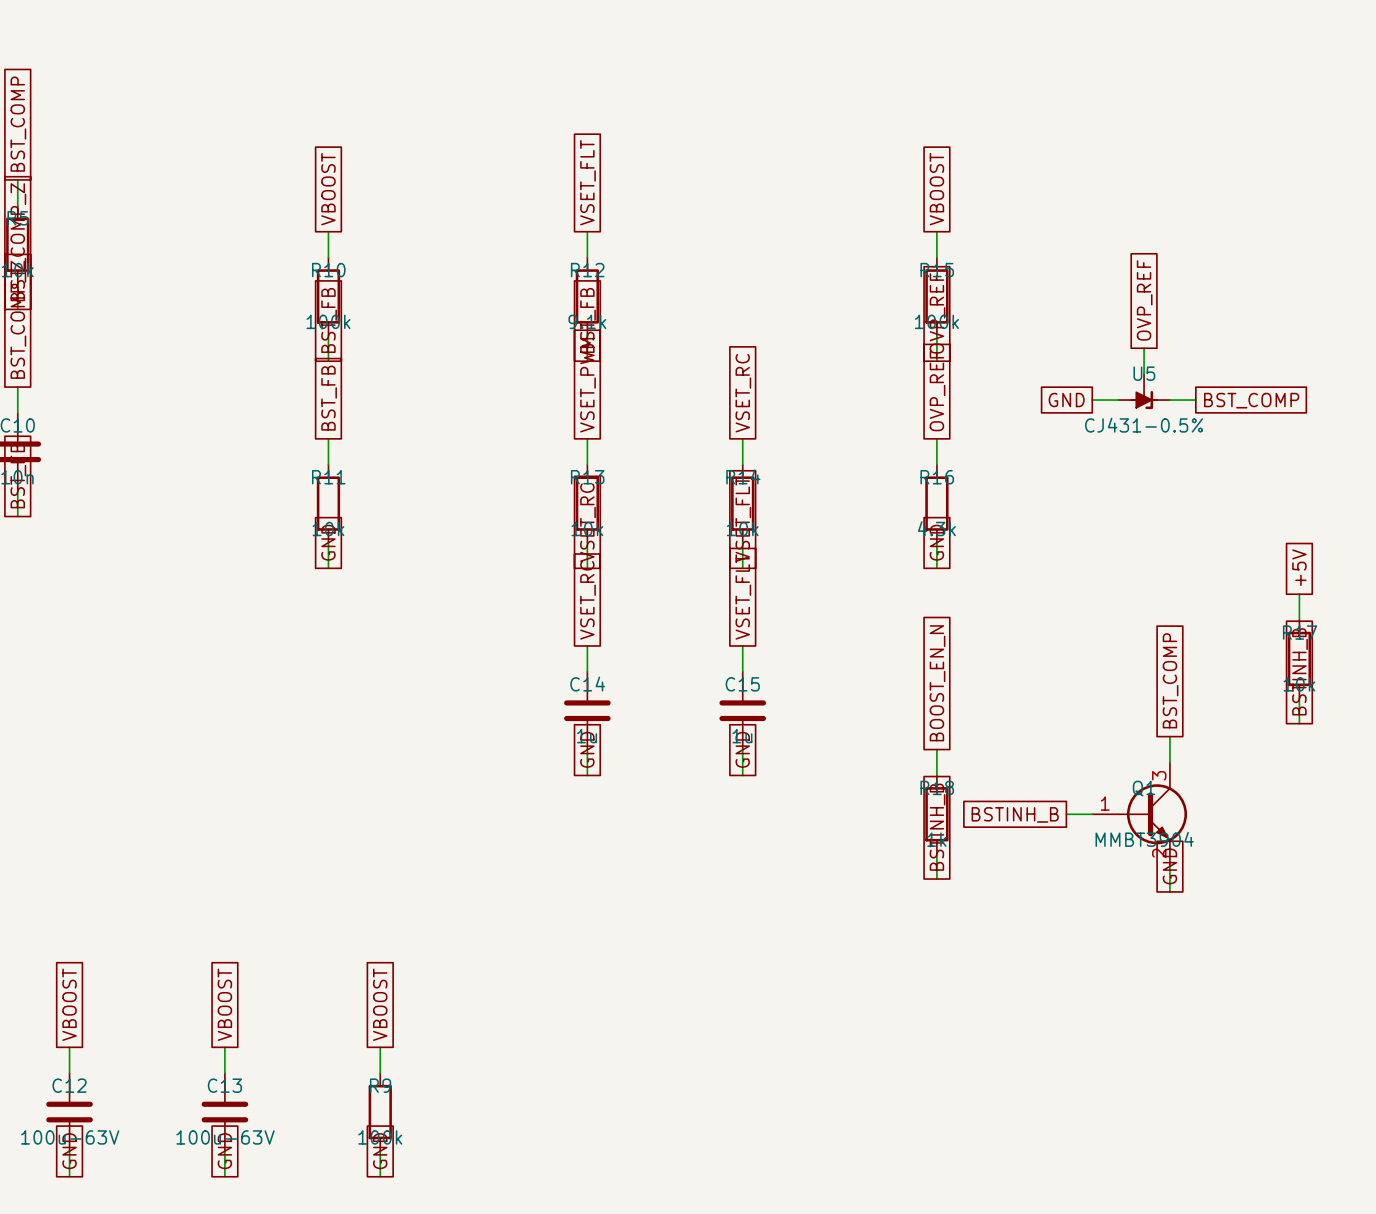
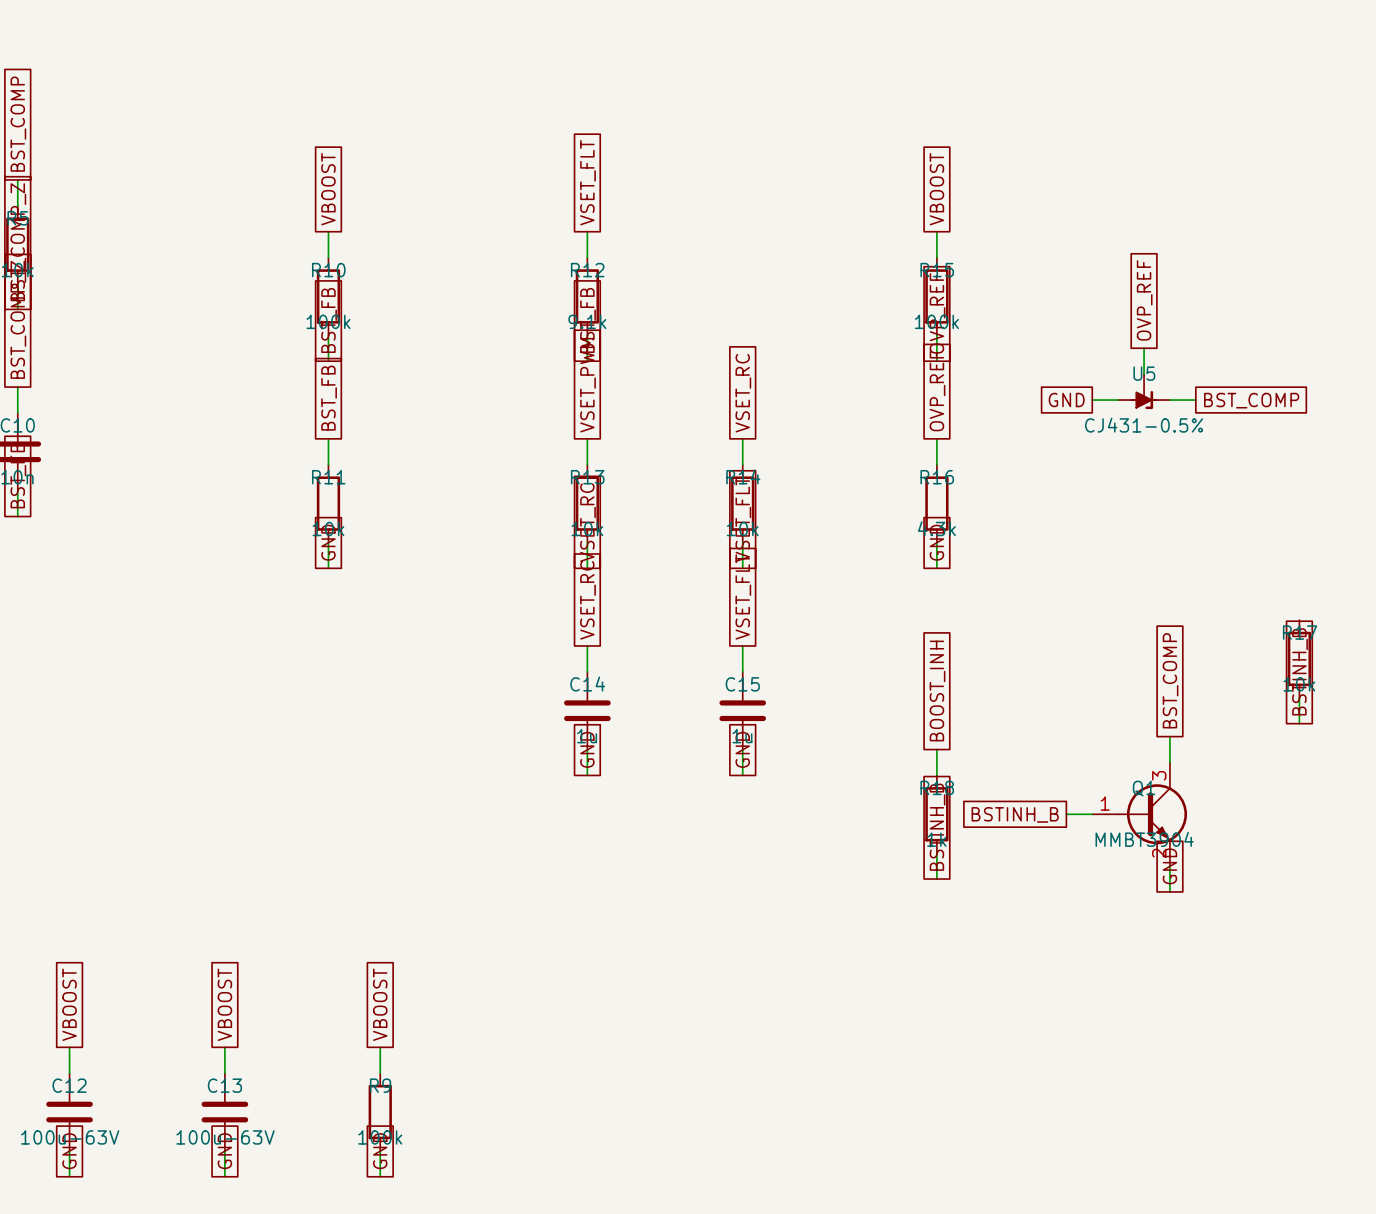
global label: +5V (1299, 567) -> none
wire: (1299, 594) (1299, 620) -> none
global label: BOOST_EN_N (937, 683) -> BOOST_INH (937, 690)

